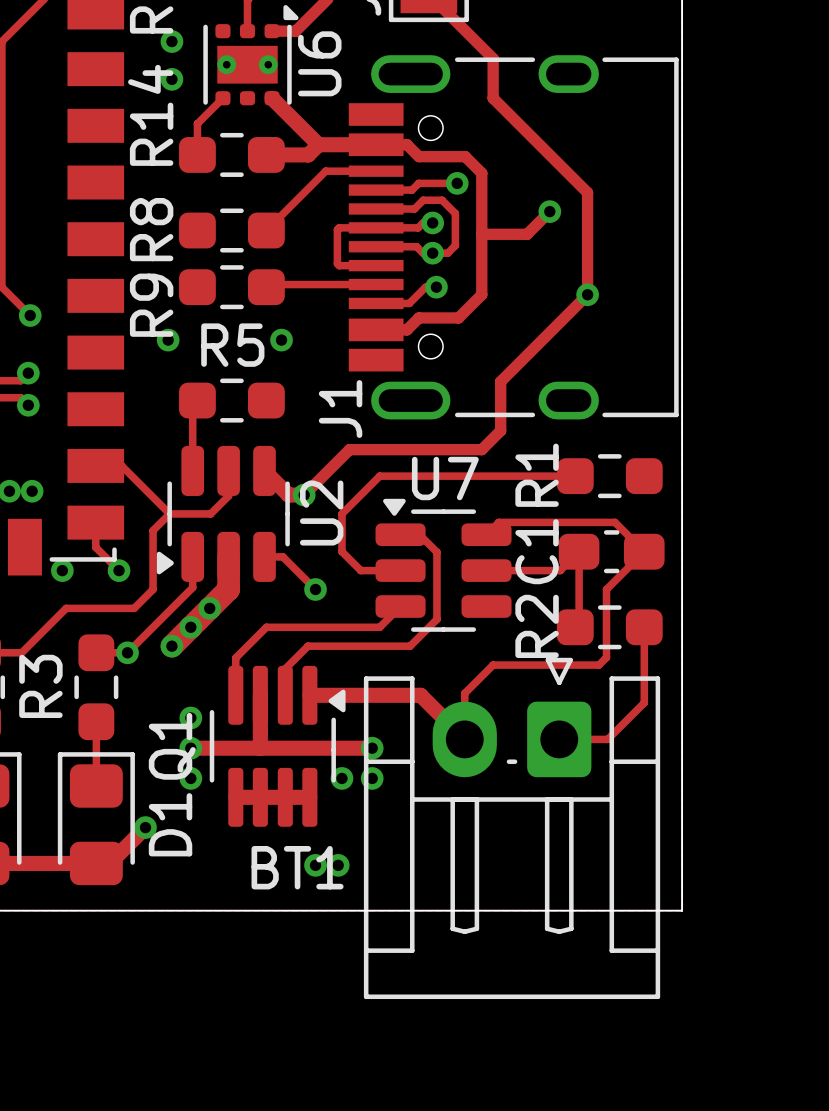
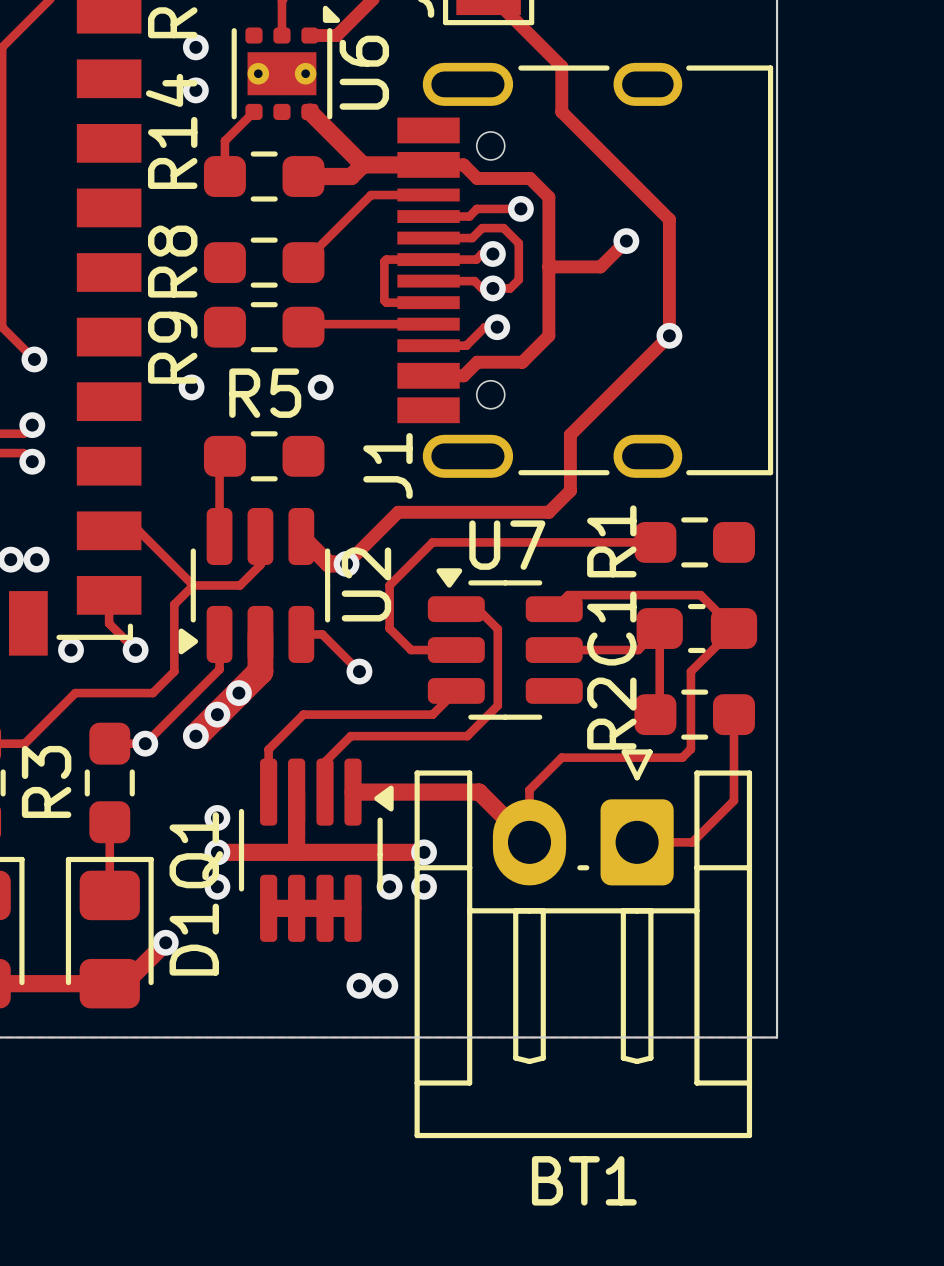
BT1 name position: BT1 (297, 867) -> BT1 (584, 1180)

